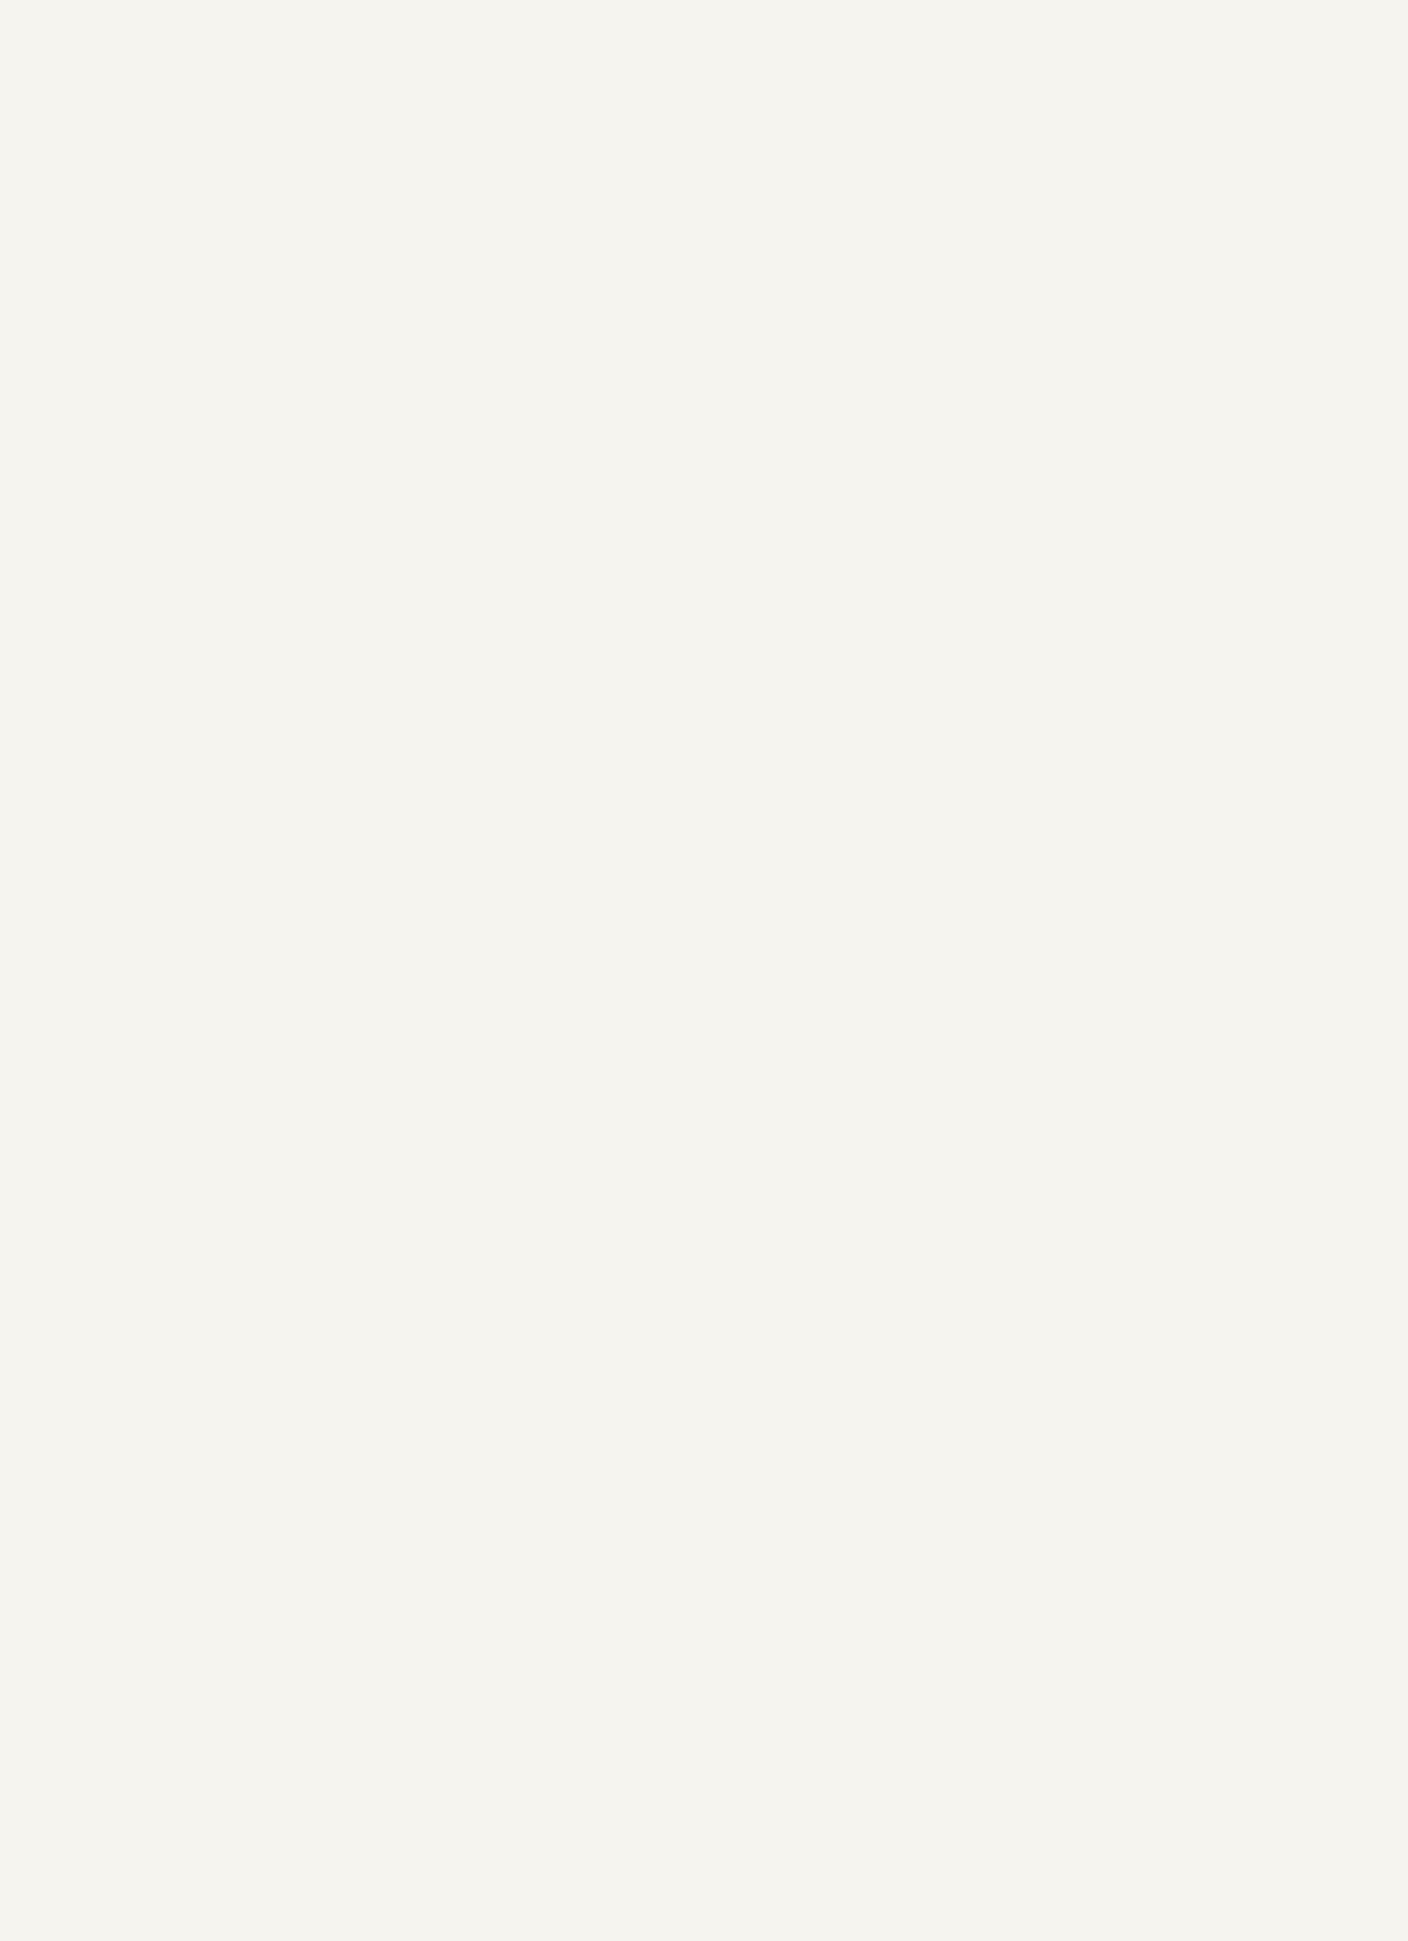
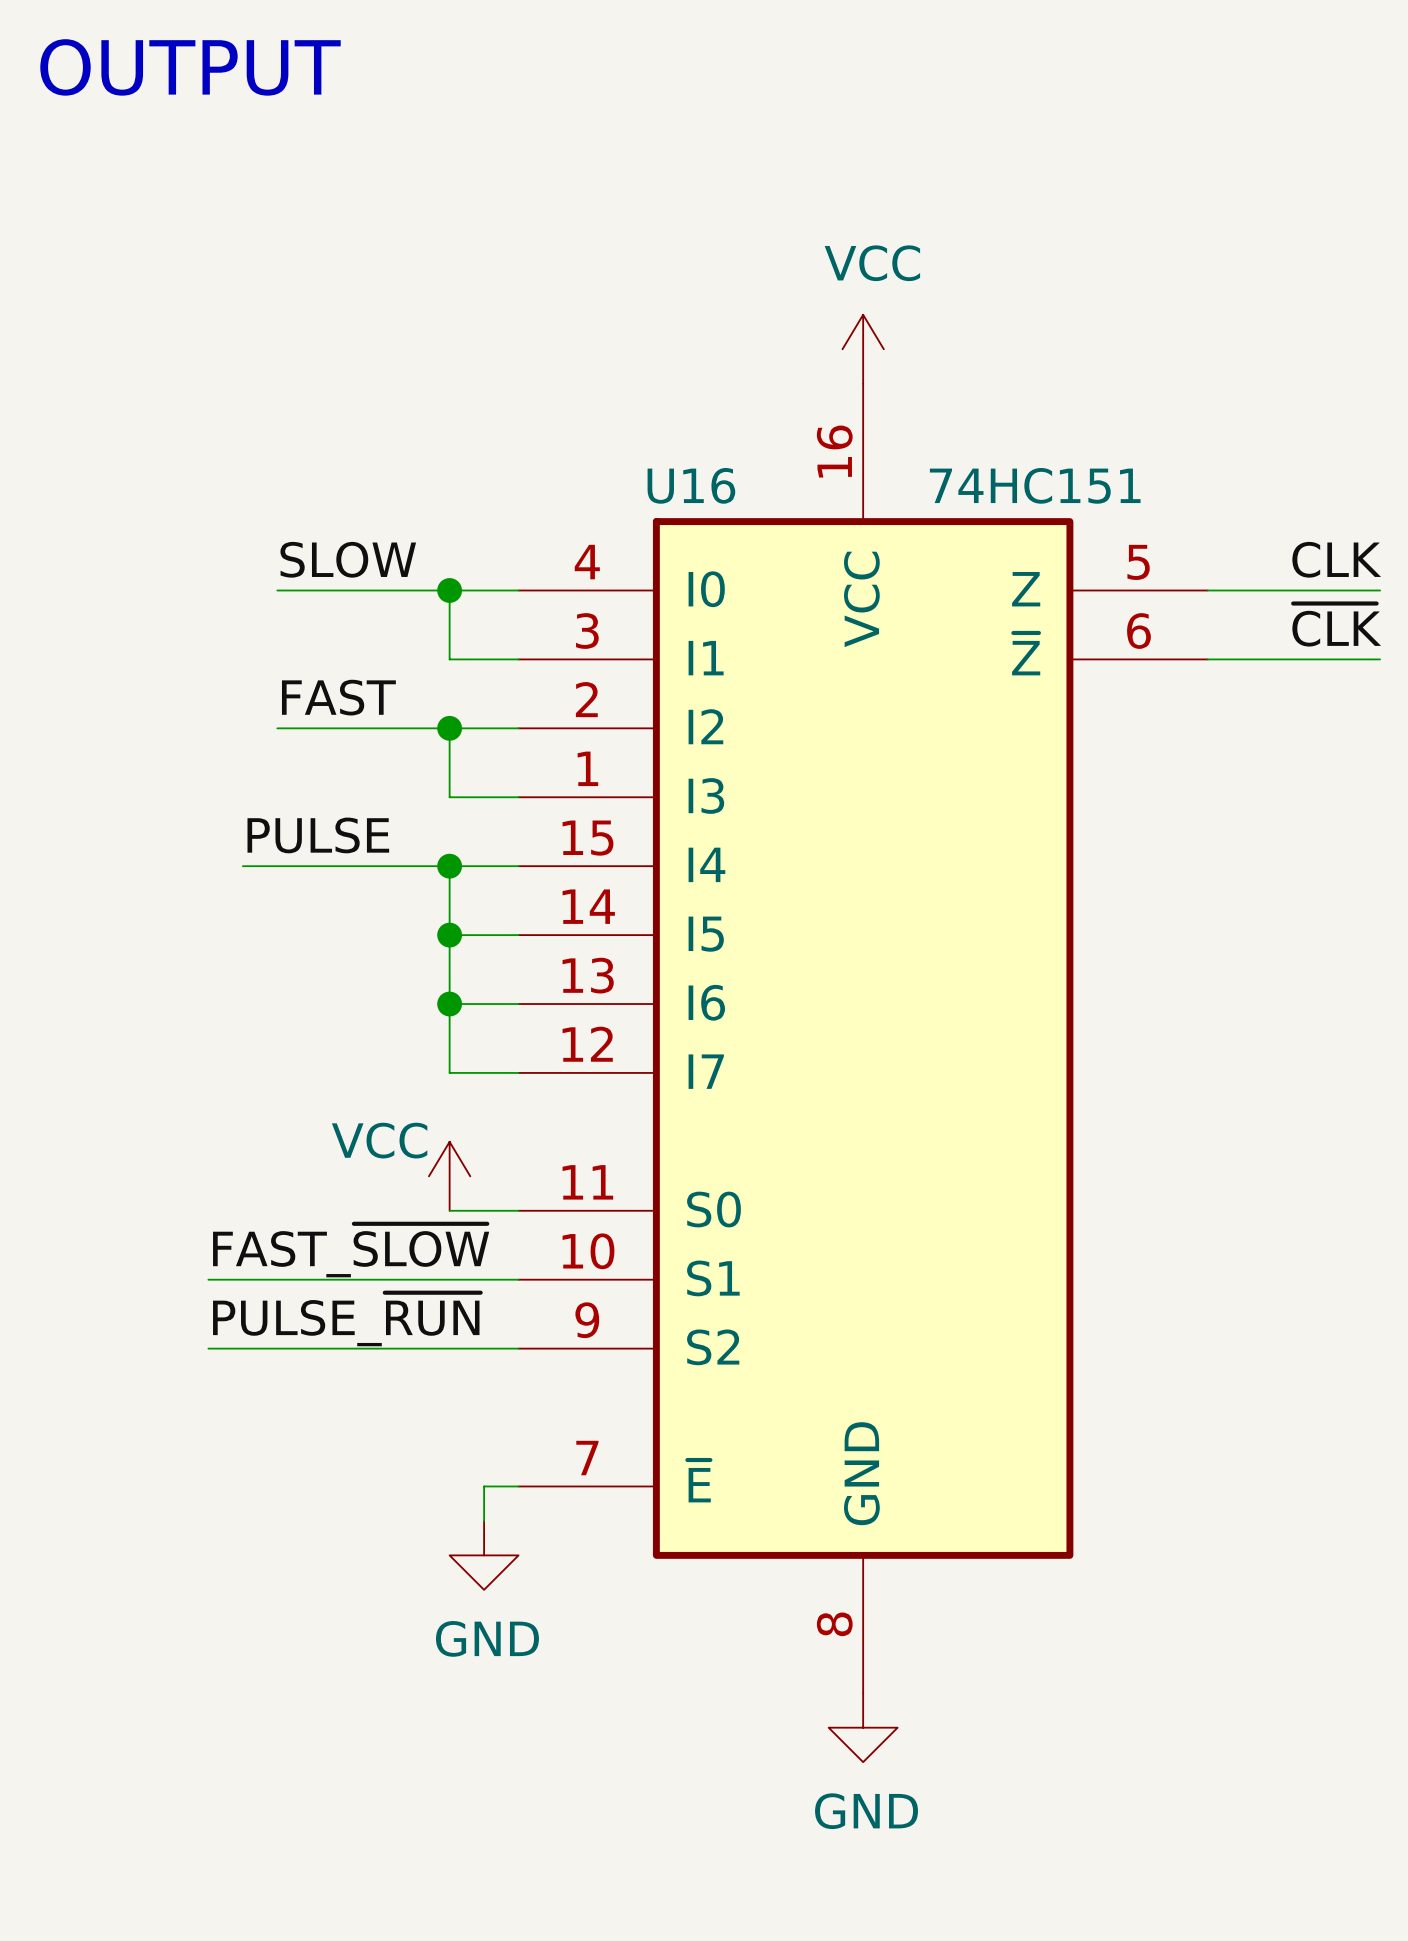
text: none -> OUTPUT (190, 67)
power symbol: none -> VCC (863, 349)
label: none -> SLOW (348, 559)
label: none -> CLK (1336, 559)
wire: none -> (277, 590) (518, 590)
wire: none -> (449, 590) (449, 659) (518, 659)
junction: none -> (449, 590)
wire: none -> (1207, 590) (1380, 590)
label: none -> ~{CLK} (1336, 625)
wire: none -> (1207, 659) (1380, 659)
label: none -> FAST (338, 697)
wire: none -> (277, 728) (518, 728)
wire: none -> (449, 728) (449, 797) (518, 797)
junction: none -> (449, 728)
label: none -> PULSE (318, 835)
wire: none -> (242, 866) (518, 866)
wire: none -> (449, 866) (449, 1072) (518, 1072)
junction: none -> (449, 866)
wire: none -> (449, 935) (518, 935)
junction: none -> (449, 935)
wire: none -> (449, 1004) (518, 1004)
junction: none -> (449, 1004)
U16: none -> 74HC151 (863, 1038)
power symbol: none -> VCC (449, 1176)
wire: none -> (449, 1210) (518, 1210)
label: none -> FAST_~{SLOW} (351, 1250)
wire: none -> (208, 1279) (518, 1279)
label: none -> PULSE_~{RUN} (346, 1319)
wire: none -> (208, 1348) (518, 1348)
wire: none -> (518, 1486) (484, 1486) (484, 1520)
power symbol: none -> GND (484, 1555)
power symbol: none -> GND (863, 1727)

